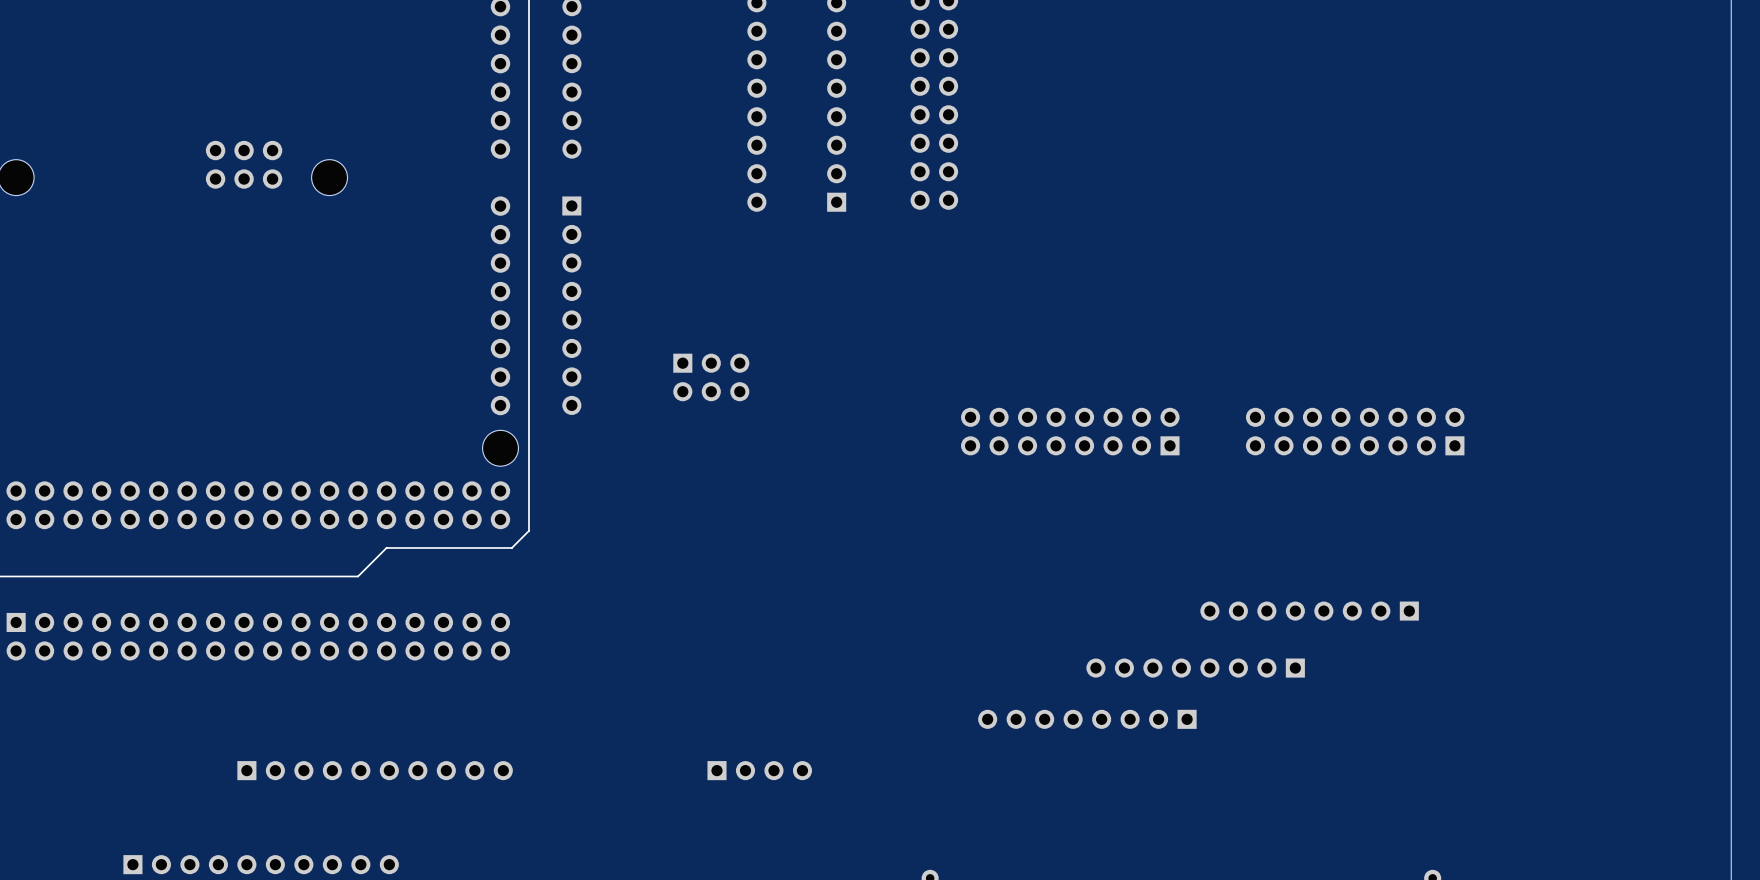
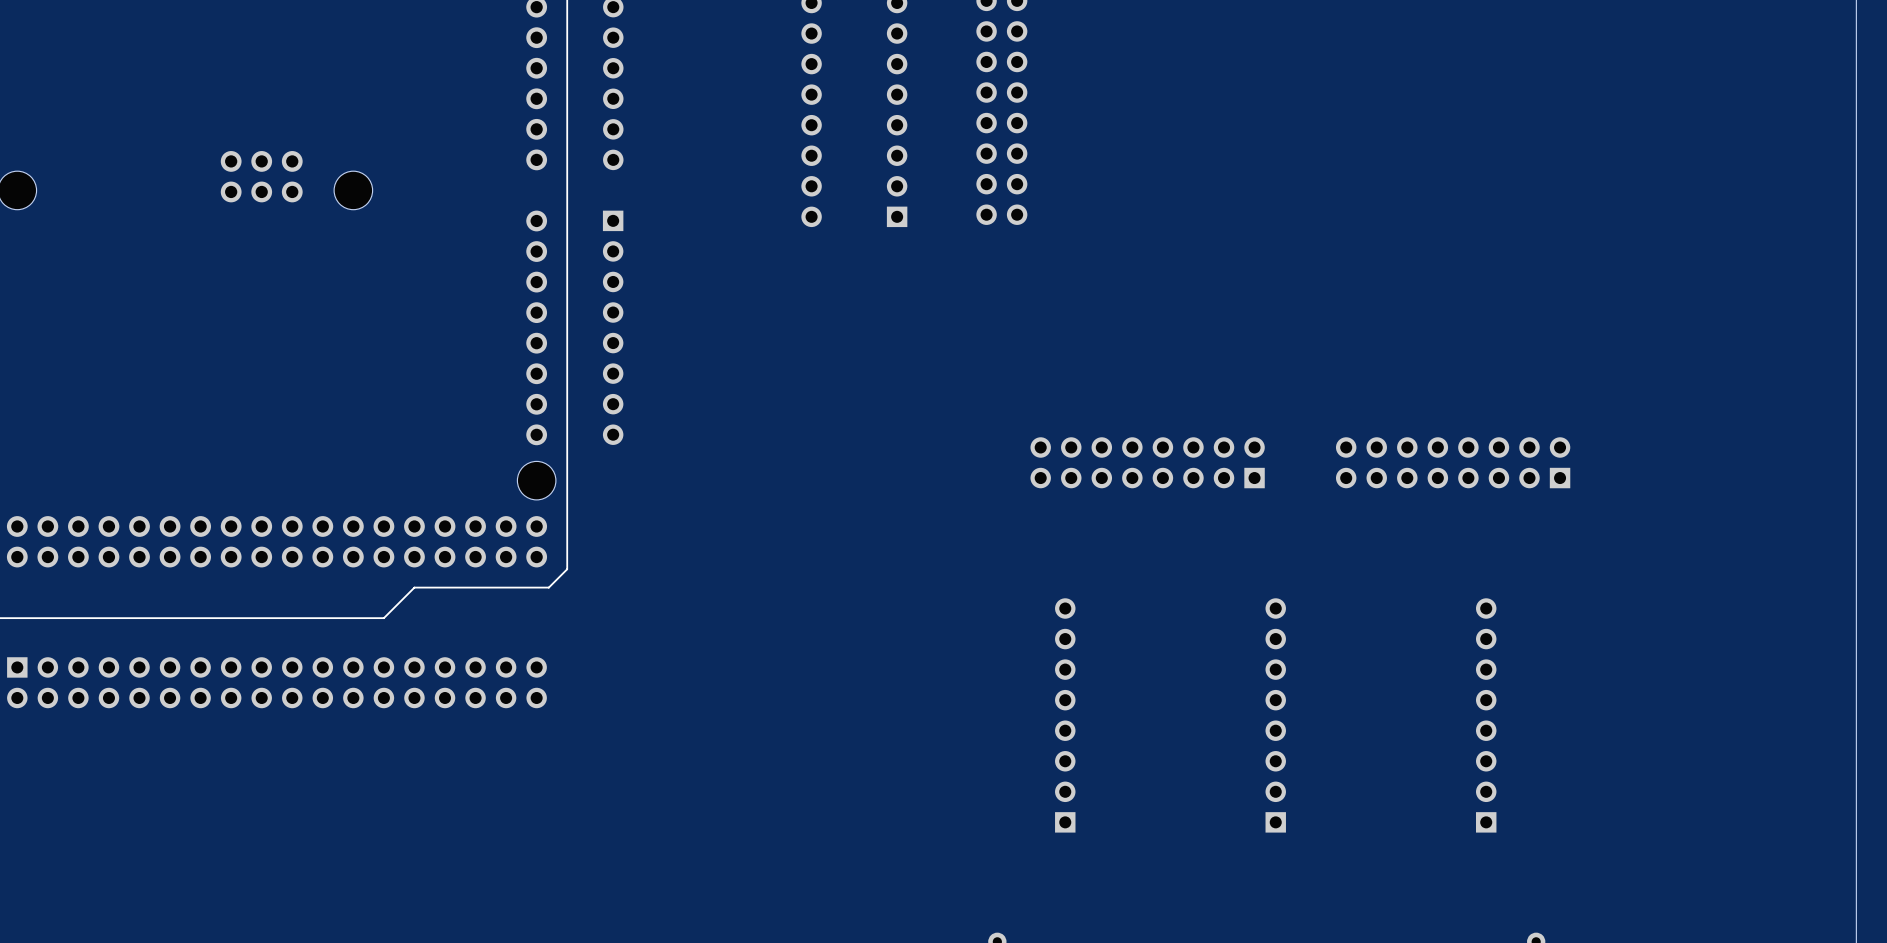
part: (711, 377) -> none
part rotation: 0° (1309, 611) -> 90° clockwise (1486, 715)
part rotation: 0° (1195, 668) -> 90° clockwise (1275, 715)
part rotation: 0° (1087, 719) -> 90° clockwise (1065, 715)
part: (375, 770) -> none
part: (759, 770) -> none
part: (261, 864) -> none

